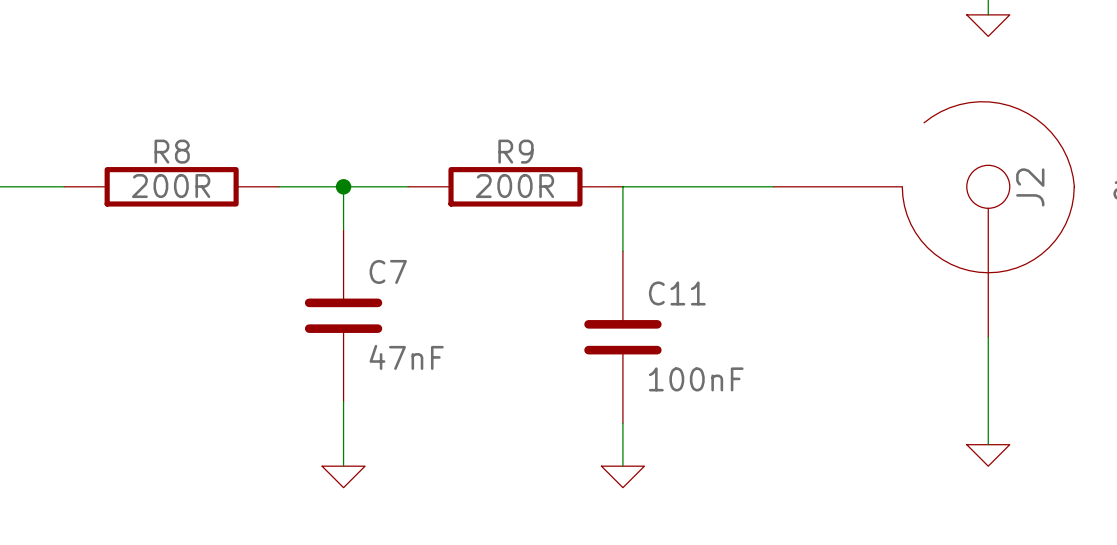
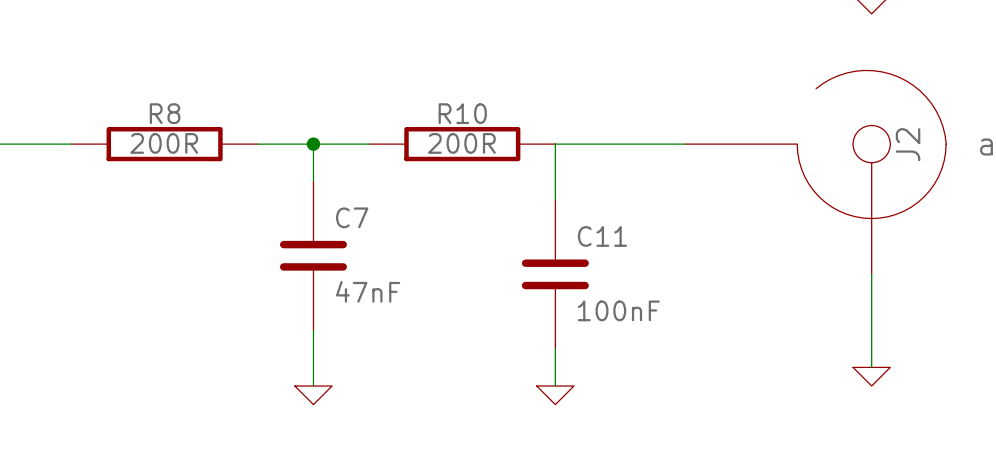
R9 name: R9 (516, 151) -> R10 (462, 113)

